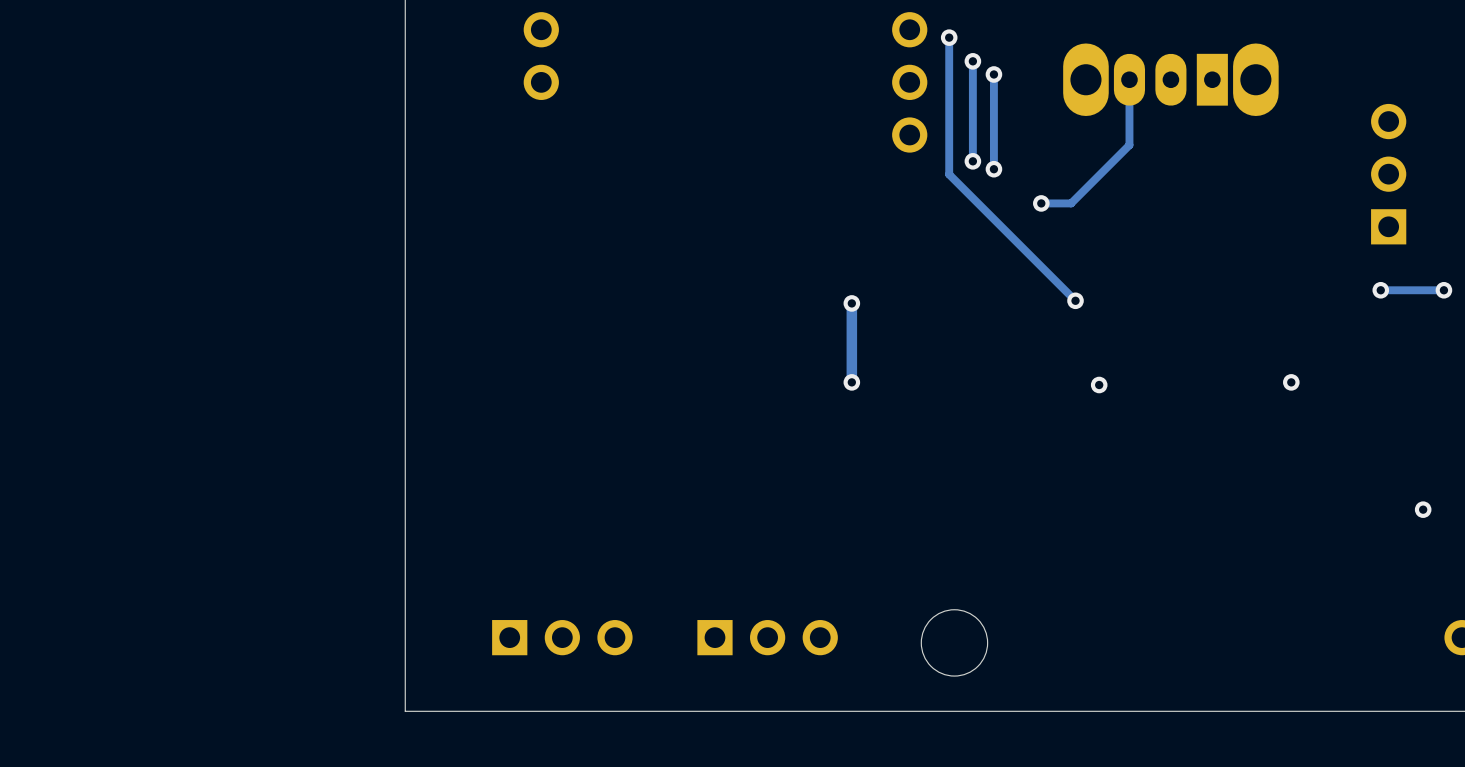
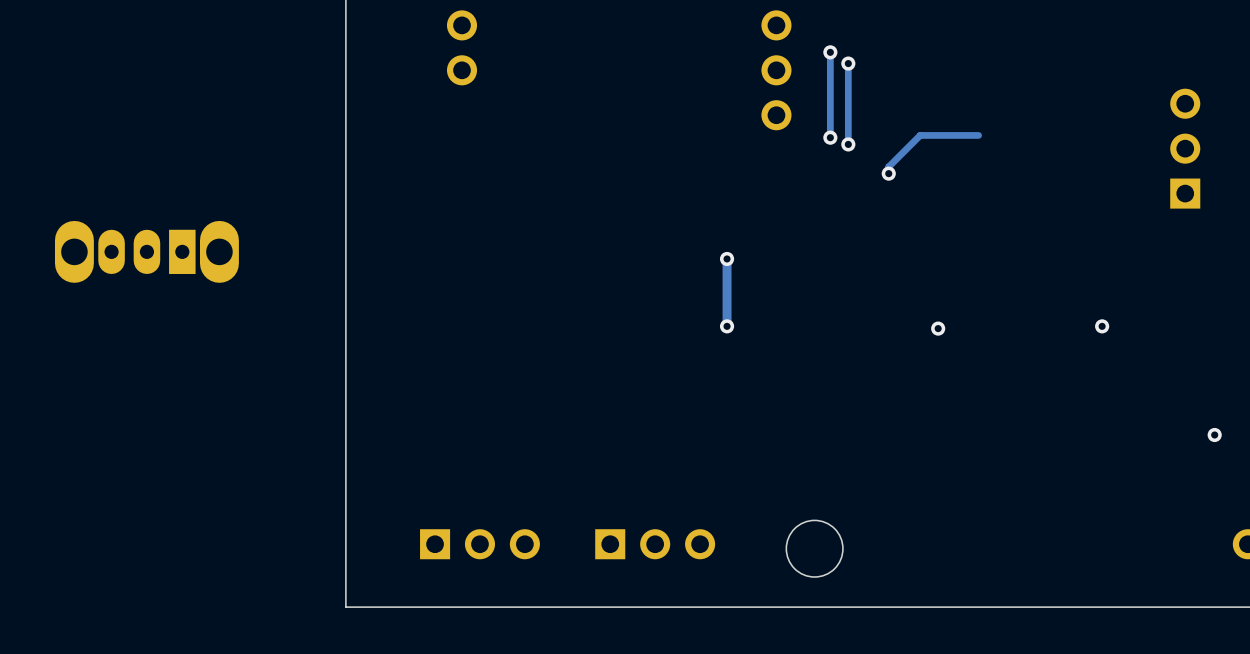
track: (949, 37) (949, 174) (1075, 300) -> none
via: (949, 37) -> none
track: (1129, 79) (1129, 145) (1071, 203) (1041, 203) -> (978, 135) (920, 135) (888, 166) (888, 173)
part: (1170, 79) -> none
via: (1380, 290) -> none
track: (1443, 290) (1380, 290) -> none
via: (1443, 290) -> none
part: none -> (146, 251)
via: (1075, 300) -> none

